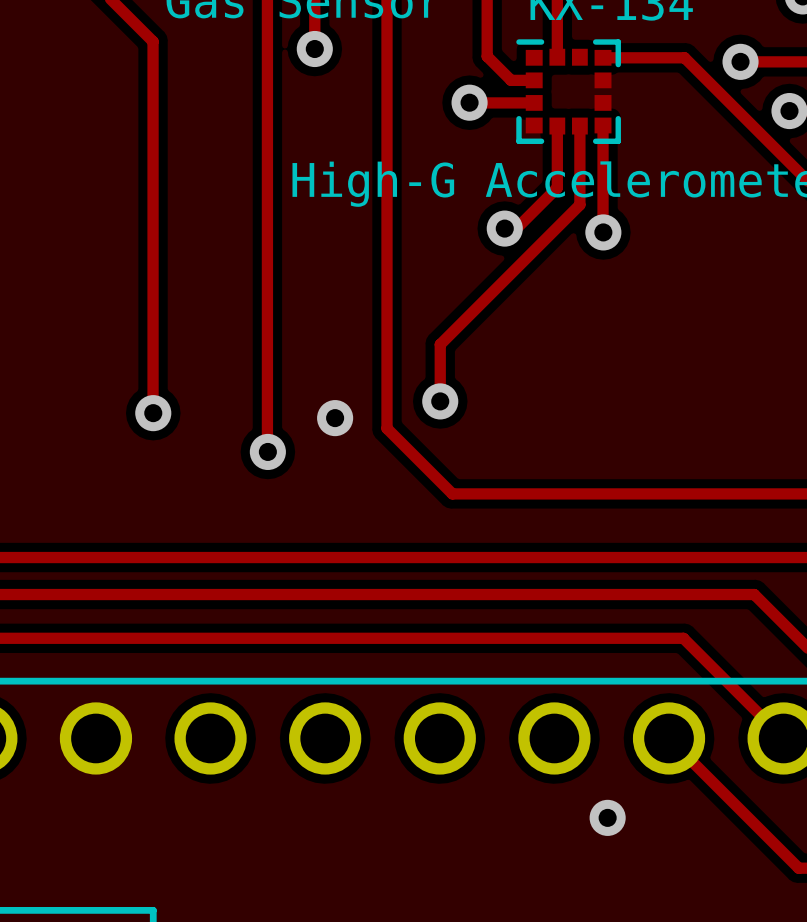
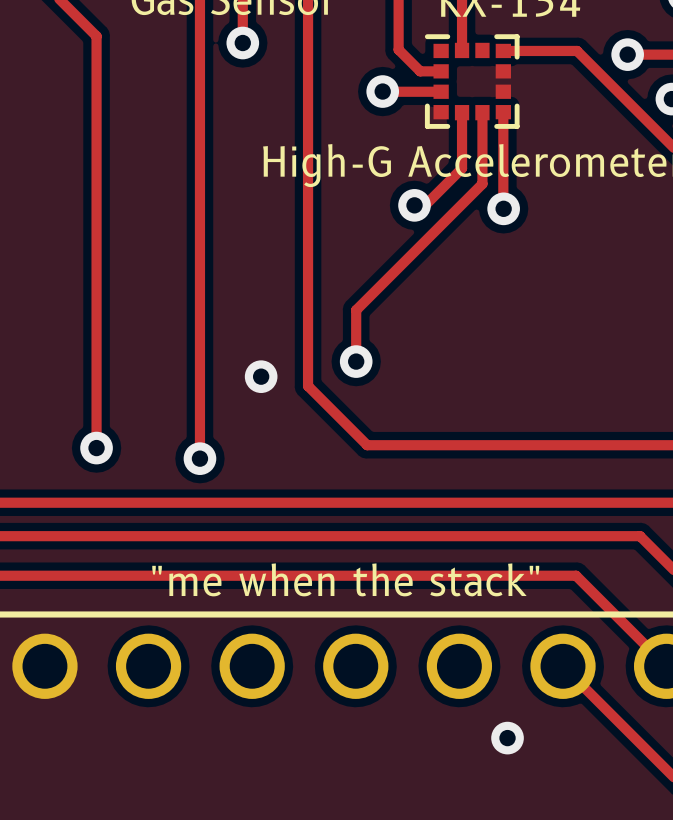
track: none -> (96, 371) (96, 448)
via: (153, 413) -> none
track: none -> (199, 406) (199, 458)
via position: (267, 451) -> (199, 458)
via: none -> (96, 448)
text: none -> "me when the stack" (345, 579)

